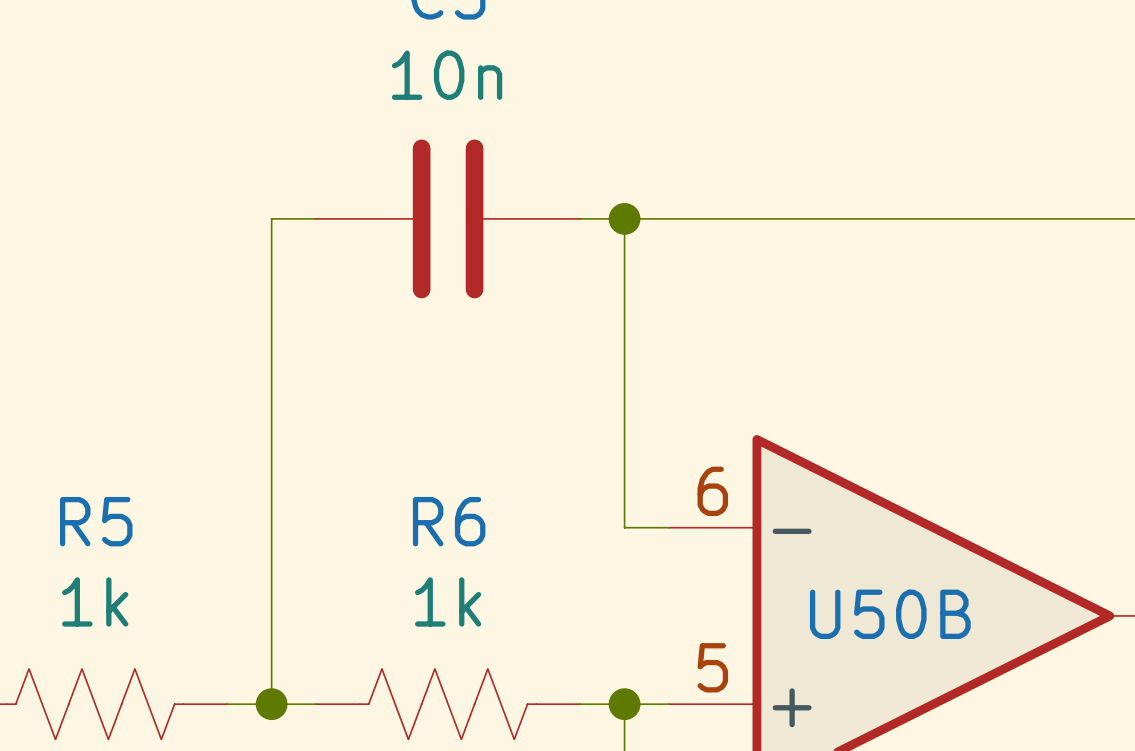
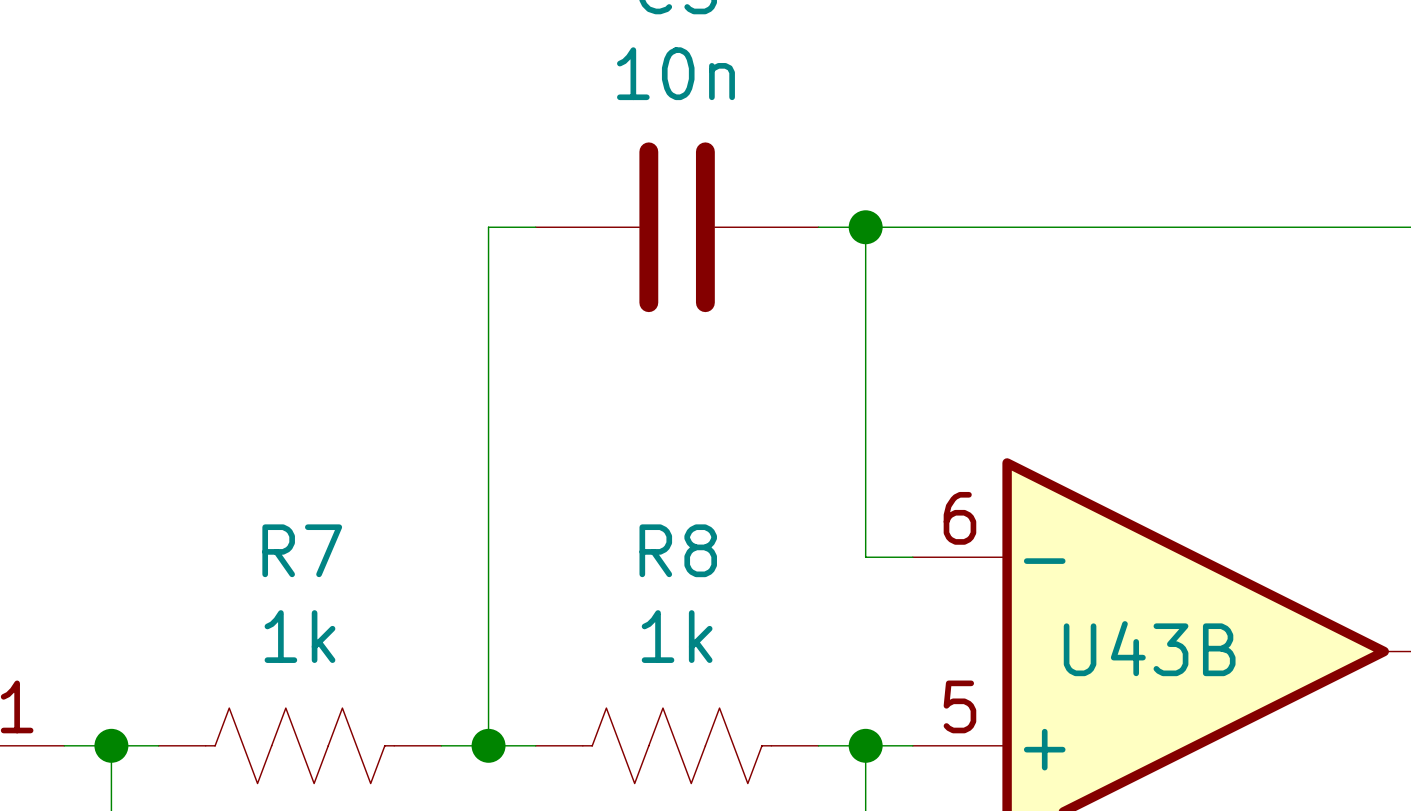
R5 name: R5 (96, 521) -> R7 (302, 550)
R6 name: R6 (449, 521) -> R8 (678, 550)
U50B name: U50B (890, 614) -> U43B (1149, 648)

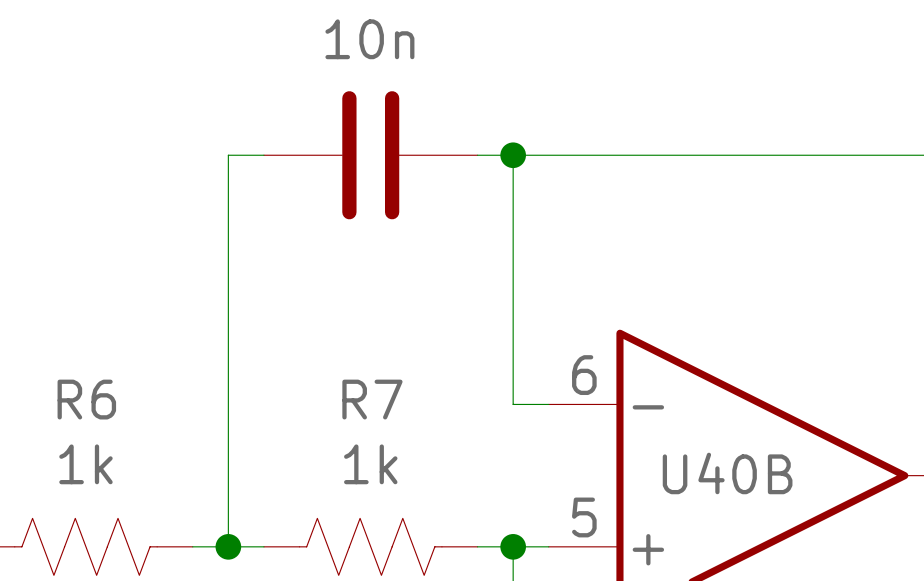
R7 name: R7 (302, 550) -> R6 (86, 399)
R8 name: R8 (678, 550) -> R7 (372, 399)
U43B name: U43B (1149, 648) -> U40B (727, 473)

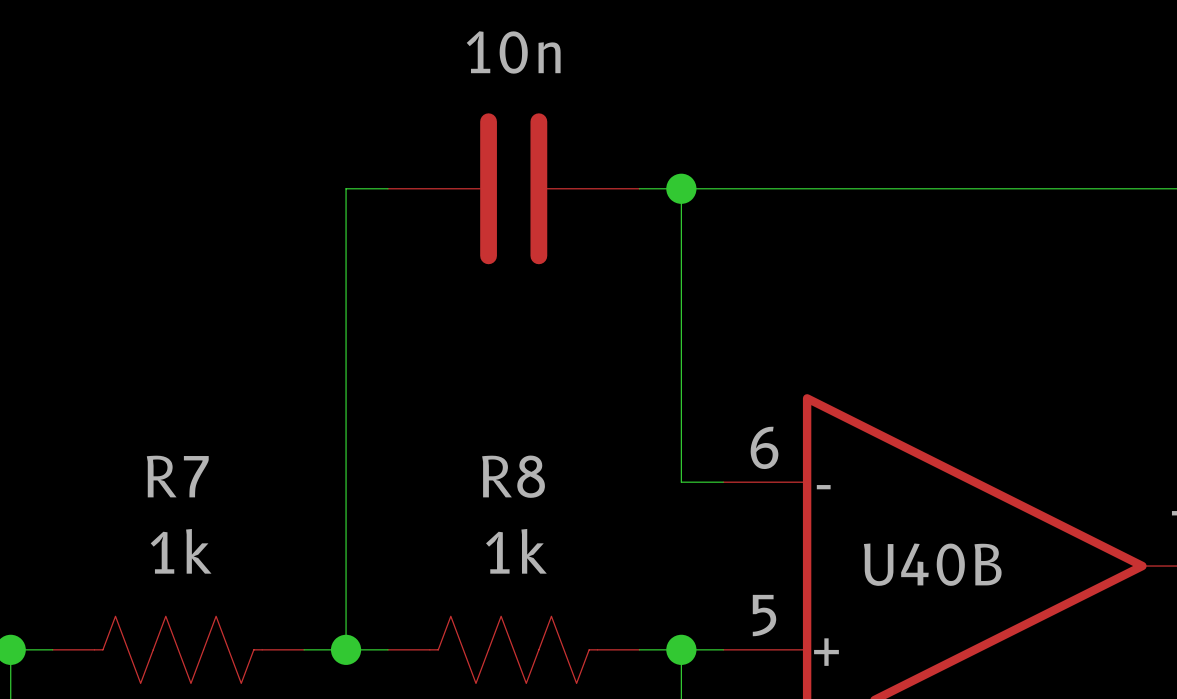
R6 name: R6 (86, 399) -> R7 (177, 476)
R7 name: R7 (372, 399) -> R8 (513, 476)

